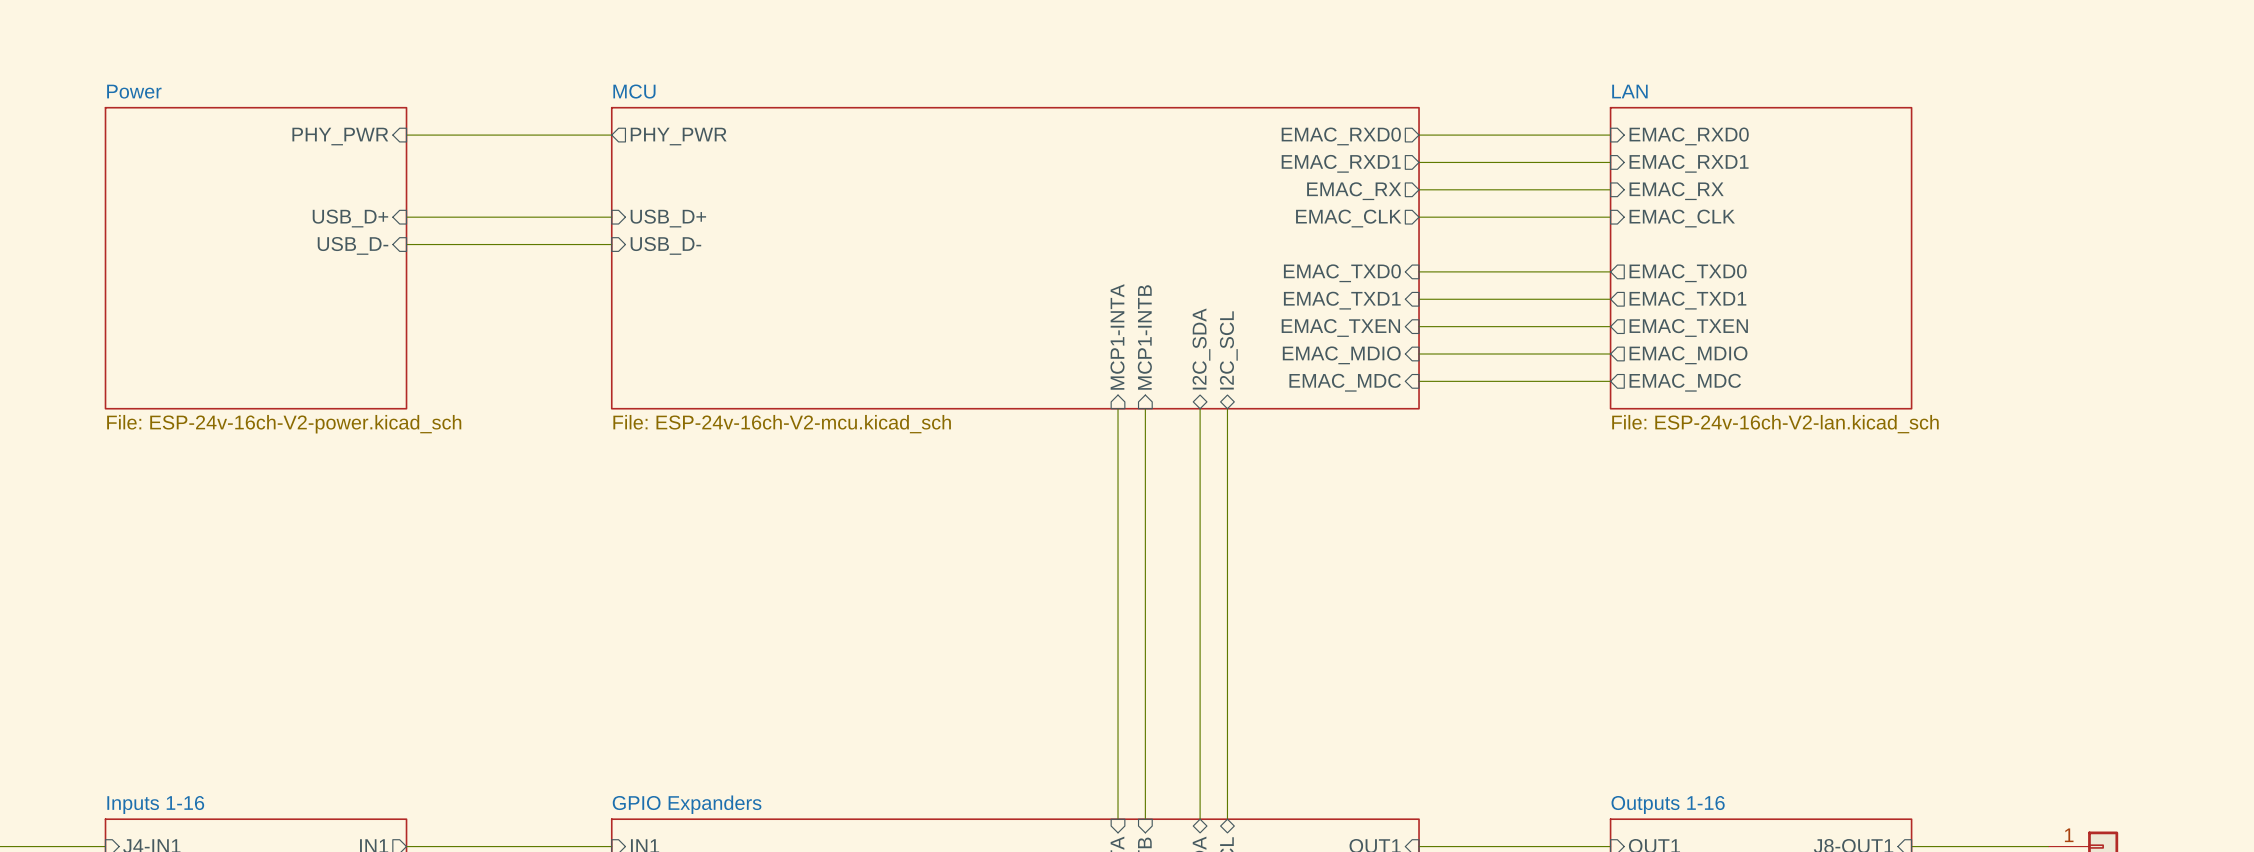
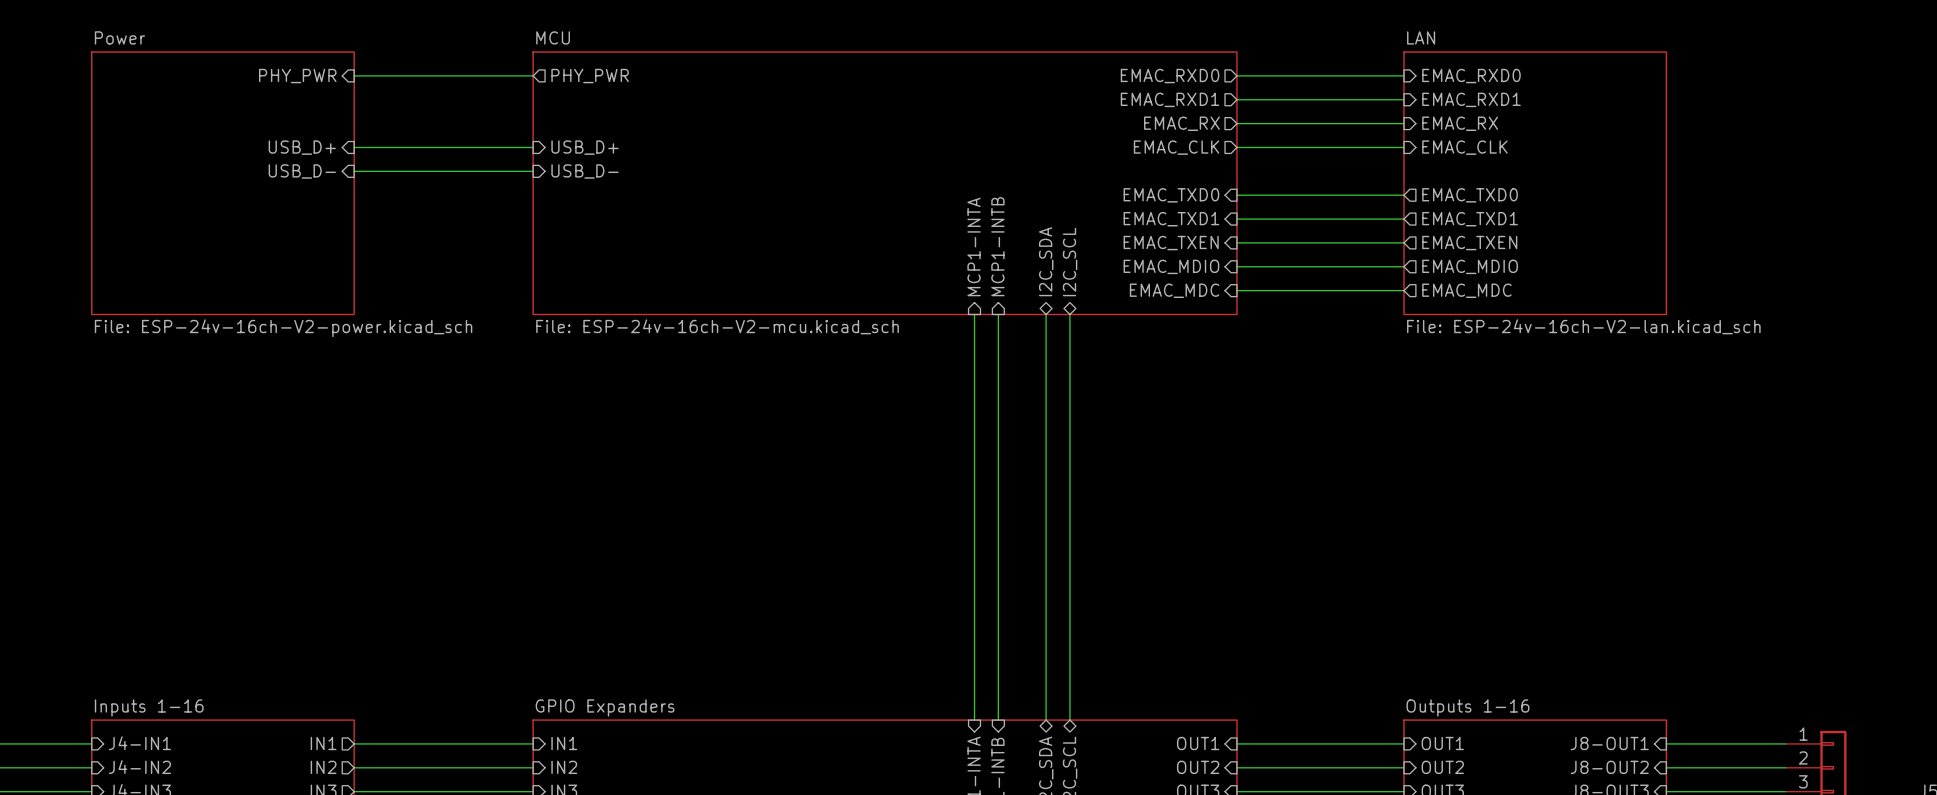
wire: none -> (1236, 75) (1403, 75)
sheet pin: none -> EMAC_RXD0 (1170, 76)
sheet pin: none -> EMAC_RXD0 (1471, 76)
sheet pin: none -> EMAC_RXD1 (1170, 99)
sheet pin: none -> EMAC_RXD1 (1471, 99)
wire: (406, 135) (611, 135) -> (354, 75) (533, 75)
sheet pin position: PHY_PWR (340, 136) -> PHY_PWR (297, 76)
sheet pin position: PHY_PWR (678, 136) -> PHY_PWR (590, 76)
sheet pin: EMAC_RXD0 (1341, 136) -> EMAC_RX (1181, 123)
sheet pin: EMAC_RXD0 (1689, 136) -> EMAC_RX (1460, 123)
sheet pin: EMAC_RXD1 (1341, 163) -> EMAC_CLK (1176, 147)
sheet pin: EMAC_RXD1 (1689, 163) -> EMAC_CLK (1464, 147)
wire: (1419, 189) (1610, 189) -> (1236, 219) (1403, 219)
sheet pin: EMAC_RX (1354, 191) -> none
sheet pin: EMAC_RX (1676, 191) -> none
wire: (406, 217) (611, 217) -> (354, 147) (533, 147)
sheet pin position: USB_D+ (350, 218) -> USB_D+ (302, 147)
sheet pin position: USB_D+ (668, 218) -> USB_D+ (585, 147)
sheet pin shape: output (1348, 218) -> input (1171, 195)
sheet pin: EMAC_CLK (1348, 218) -> EMAC_TXD0 (1171, 195)
sheet pin shape: input (1682, 218) -> output (1470, 195)
sheet pin: EMAC_CLK (1682, 218) -> EMAC_TXD0 (1470, 195)
wire: (406, 244) (611, 244) -> (354, 171) (533, 171)
sheet pin position: USB_D- (353, 245) -> USB_D- (302, 171)
sheet pin position: USB_D- (665, 245) -> USB_D- (585, 171)
sheet pin: none -> EMAC_TXD1 (1171, 219)
sheet pin: none -> EMAC_TXD1 (1470, 219)
sheet Power position: (256, 258) -> (222, 183)
sheet MCU position: (1015, 258) -> (885, 183)
sheet LAN position: (1761, 258) -> (1535, 183)
sheet pin: EMAC_TXD0 (1342, 273) -> EMAC_TXEN (1171, 243)
sheet pin: EMAC_TXD0 (1688, 273) -> EMAC_TXEN (1469, 243)
sheet pin: EMAC_TXD1 (1342, 300) -> EMAC_MDIO (1171, 266)
sheet pin: EMAC_TXD1 (1687, 300) -> EMAC_MDIO (1470, 266)
sheet pin: EMAC_TXEN (1340, 327) -> EMAC_MDC (1174, 290)
sheet pin: EMAC_TXEN (1688, 327) -> EMAC_MDC (1466, 290)
sheet pin position: MCP1-INTA (1117, 336) -> MCP1-INTA (974, 246)
sheet pin position: MCP1-INTB (1144, 337) -> MCP1-INTB (997, 246)
sheet pin position: I2C_SDA (1201, 349) -> I2C_SDA (1046, 261)
sheet pin position: I2C_SCL (1228, 350) -> I2C_SCL (1070, 262)
wire: none -> (974, 314) (974, 362)
wire: none -> (998, 314) (998, 362)
wire: none -> (1046, 314) (1046, 362)
wire: none -> (1069, 314) (1069, 362)
wire: (1419, 354) (1610, 354) -> (1236, 99) (1403, 99)
sheet pin: EMAC_MDIO (1341, 355) -> none
sheet pin: EMAC_MDIO (1688, 355) -> none
wire: (1419, 381) (1610, 381) -> none
sheet pin: EMAC_MDC (1345, 382) -> none
sheet pin: EMAC_MDC (1685, 382) -> none

